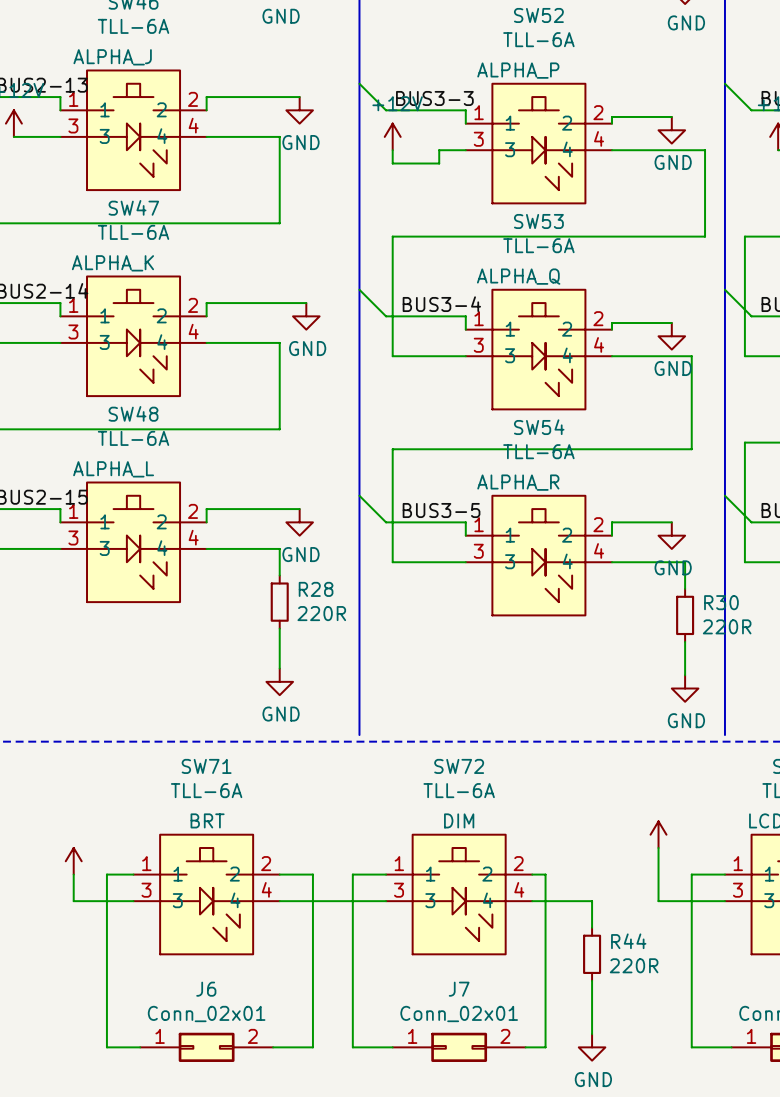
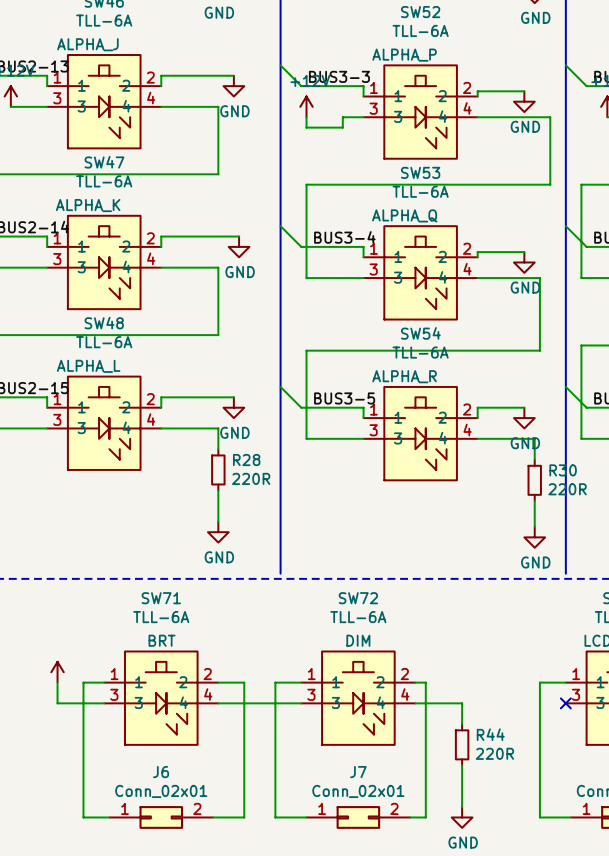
power symbol: (658, 834) -> none
wire: (658, 847) (658, 901) (724, 901) -> none
no-connect mark: none -> (565, 703)

